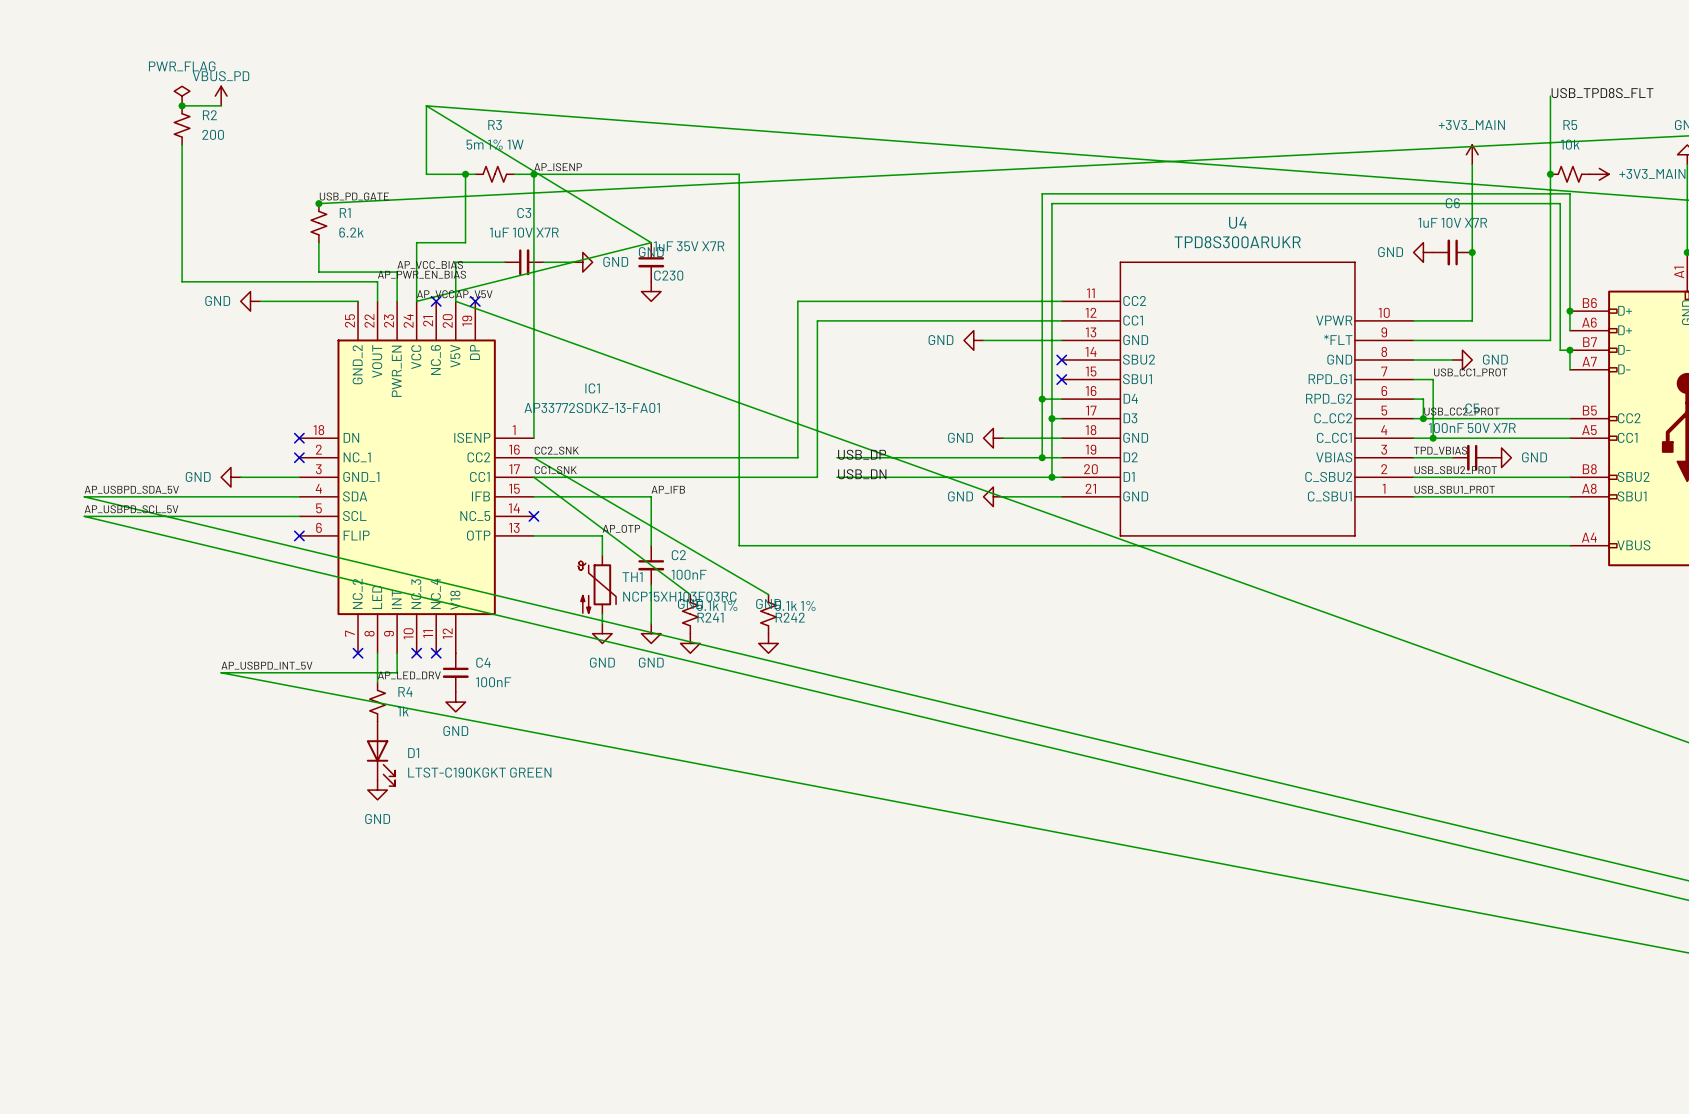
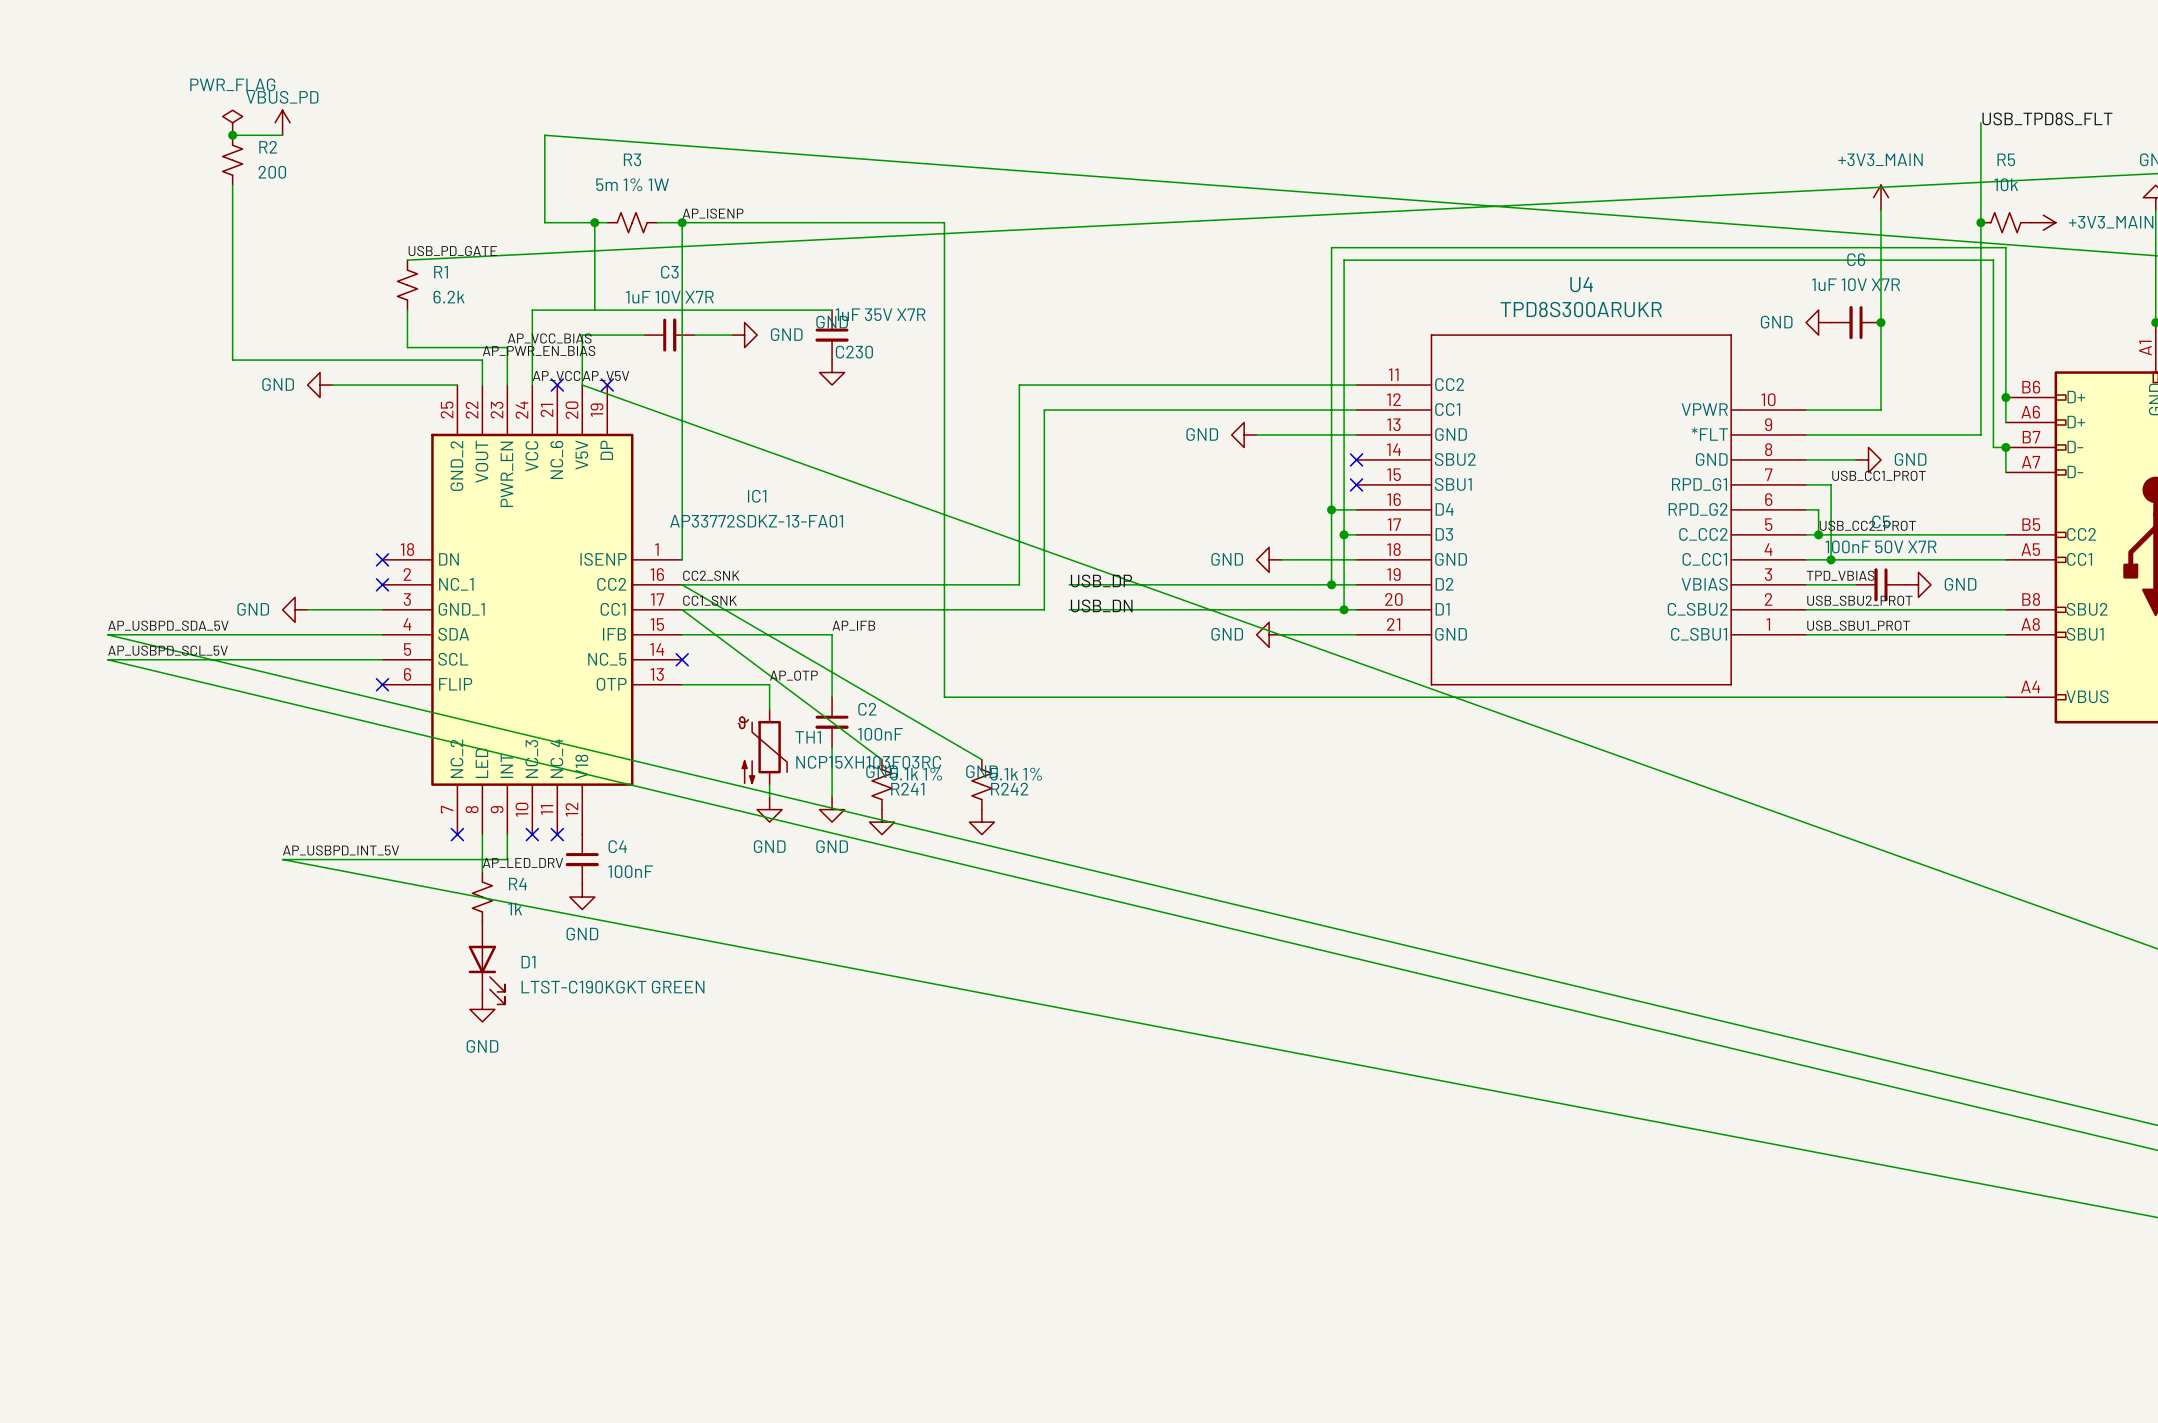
wire: (426, 105) (651, 242) (416, 301) -> none
junction: (318, 203) -> none
wire: none -> (594, 310) (832, 310)

